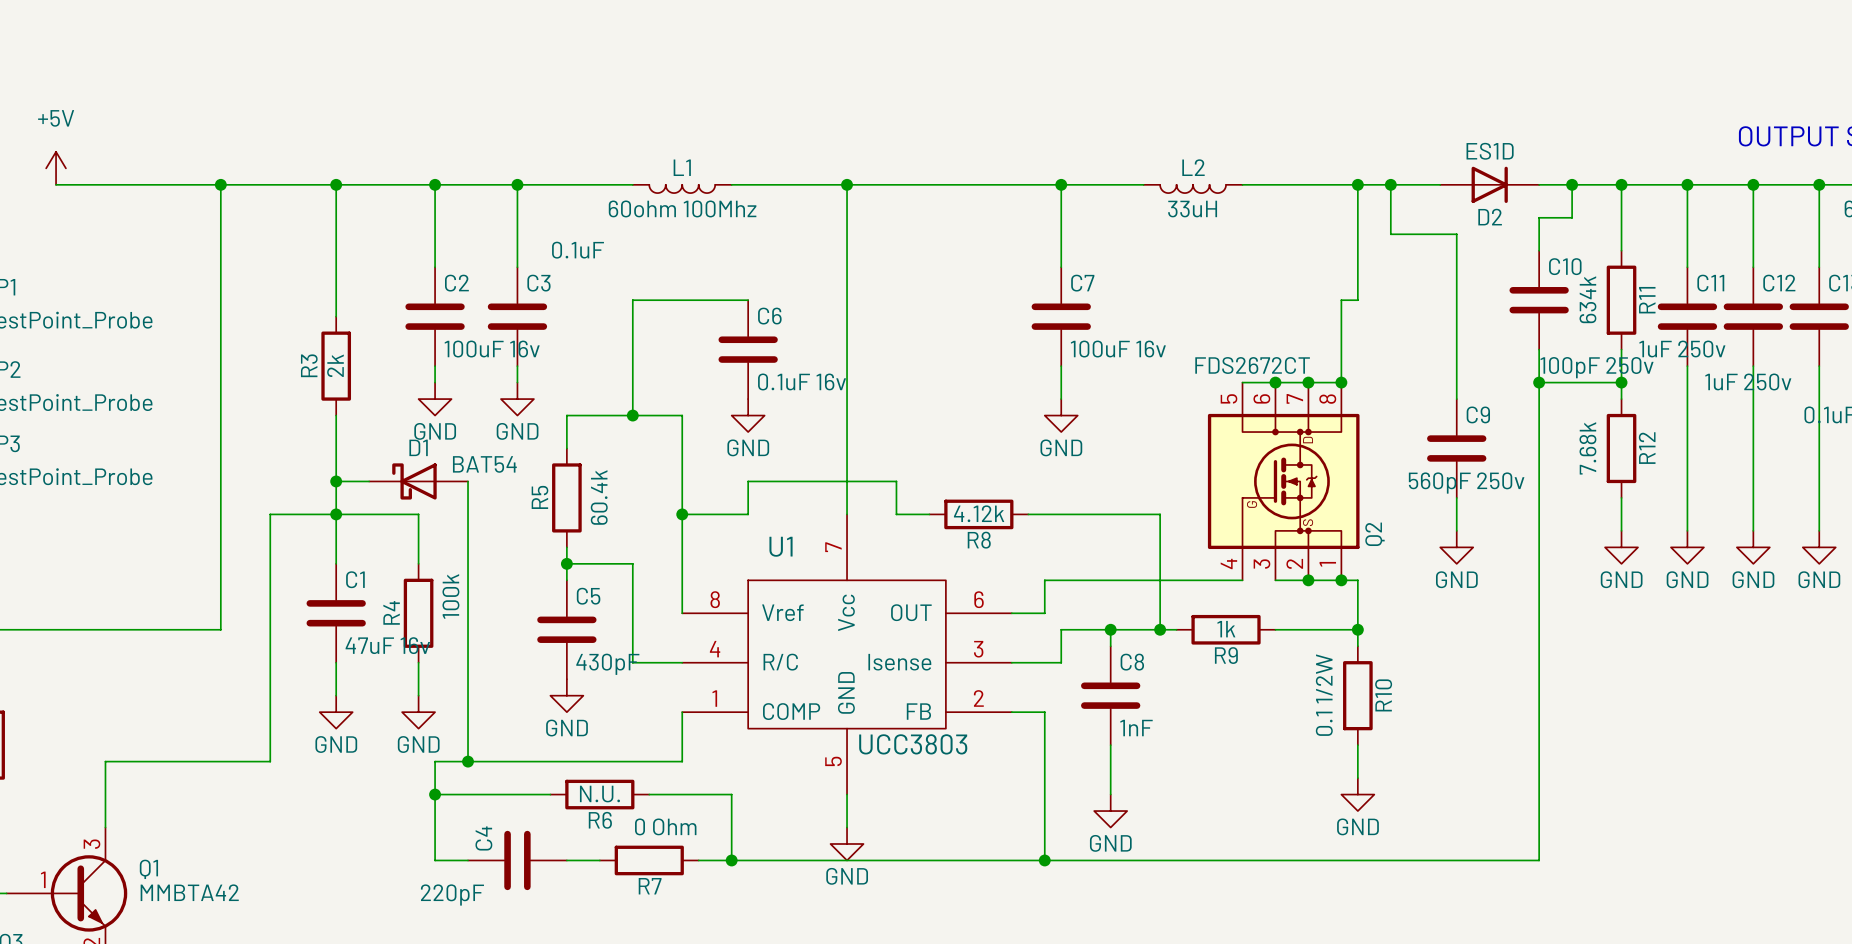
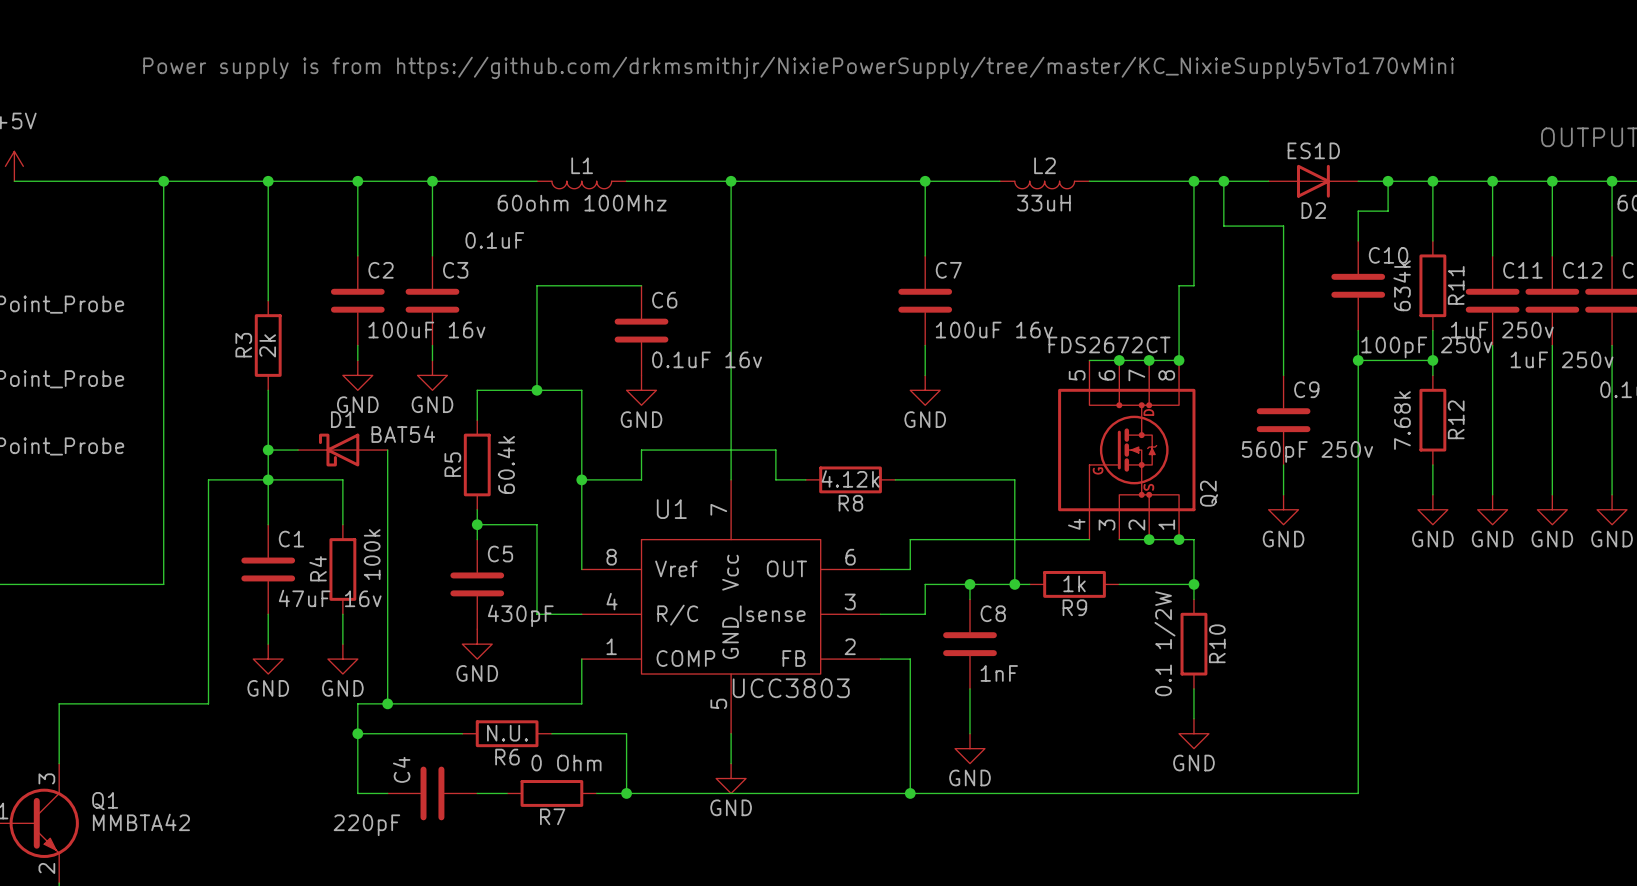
text: none -> Power supply is from https://github.com/drkmsmithjr/NixiePowerSupply/tree/master/KC_NixieSupply5vTo170vMini (798, 67)

